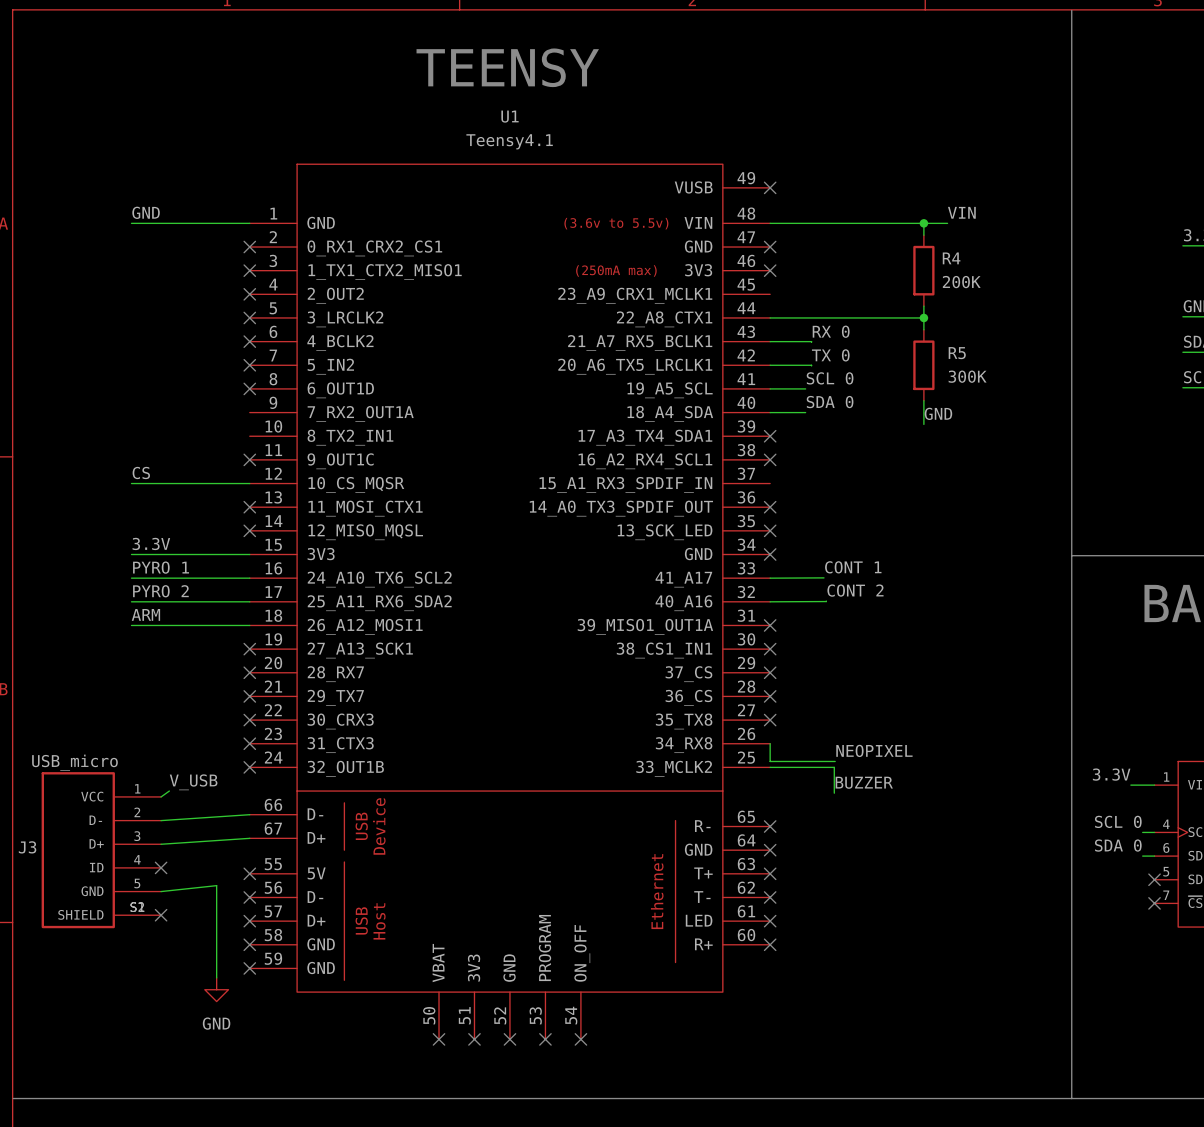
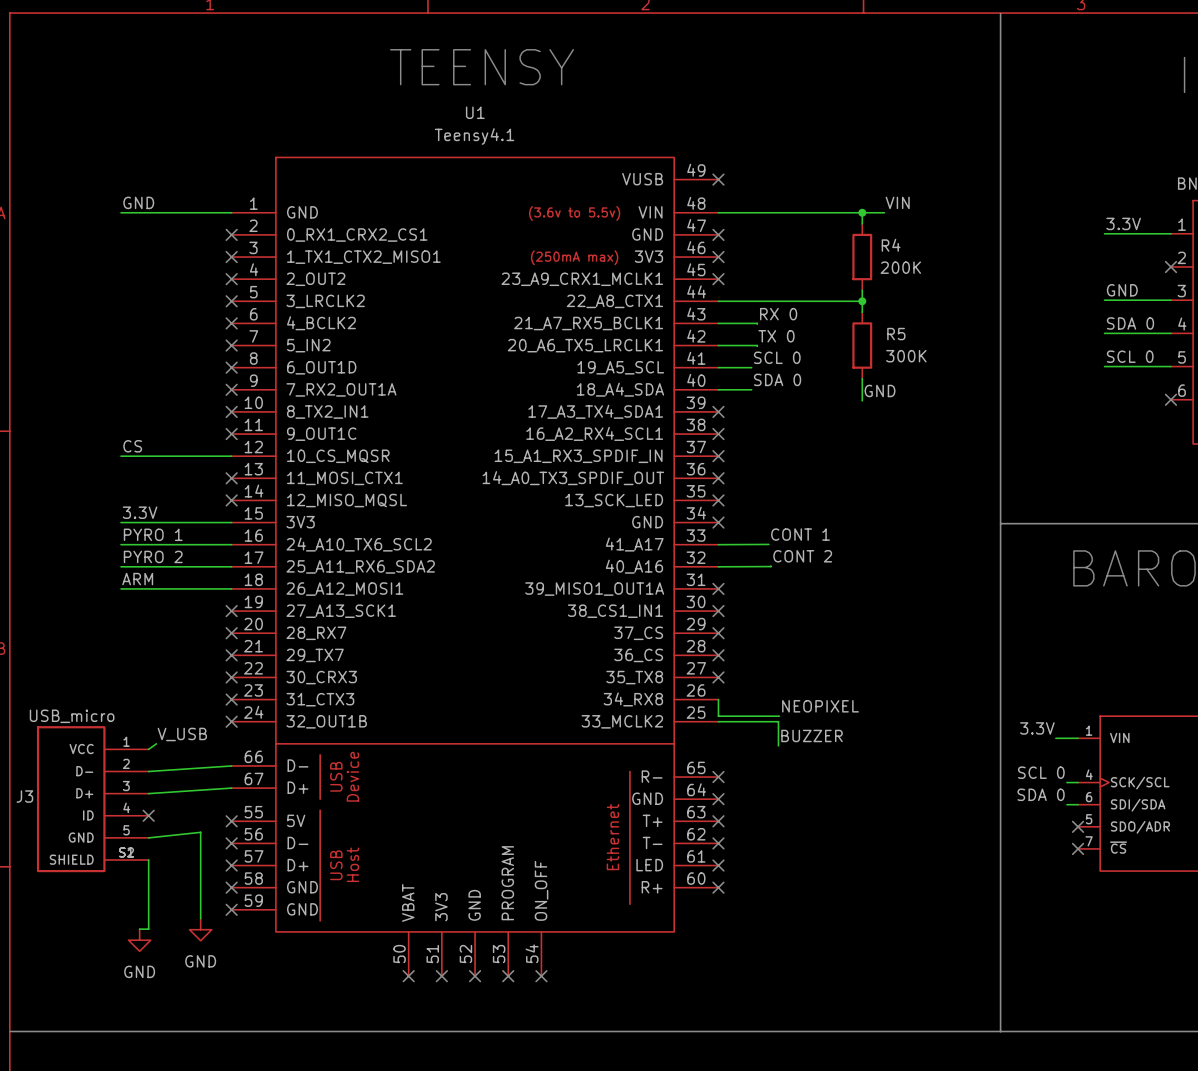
no-connect mark: none -> (718, 279)
no-connect mark: none -> (231, 389)
no-connect mark: none -> (231, 411)
no-connect mark: none -> (718, 456)
wire: none -> (148, 860) (148, 929) (139, 929)
no-connect mark: (161, 915) -> none
power symbol: none -> GND (139, 940)

